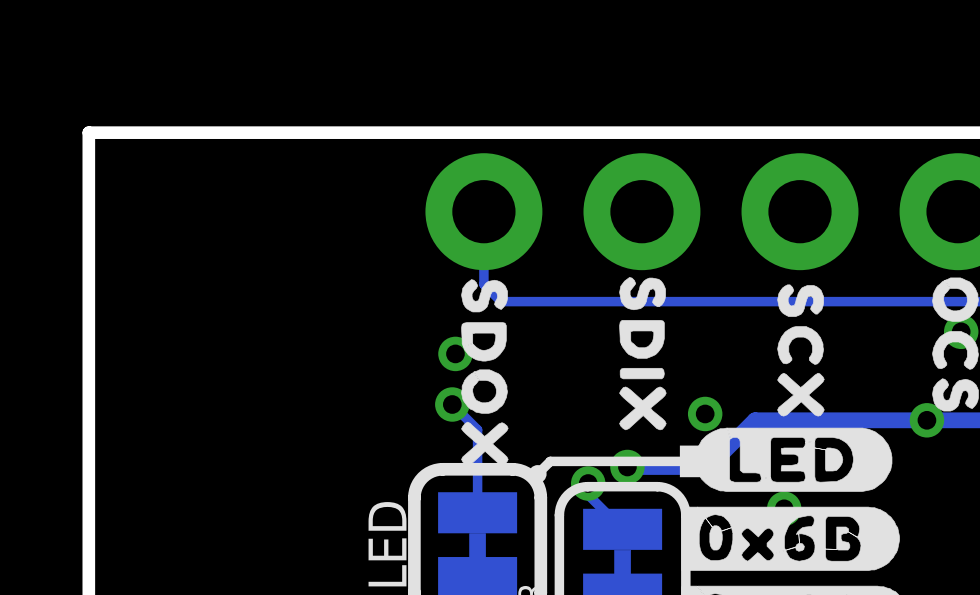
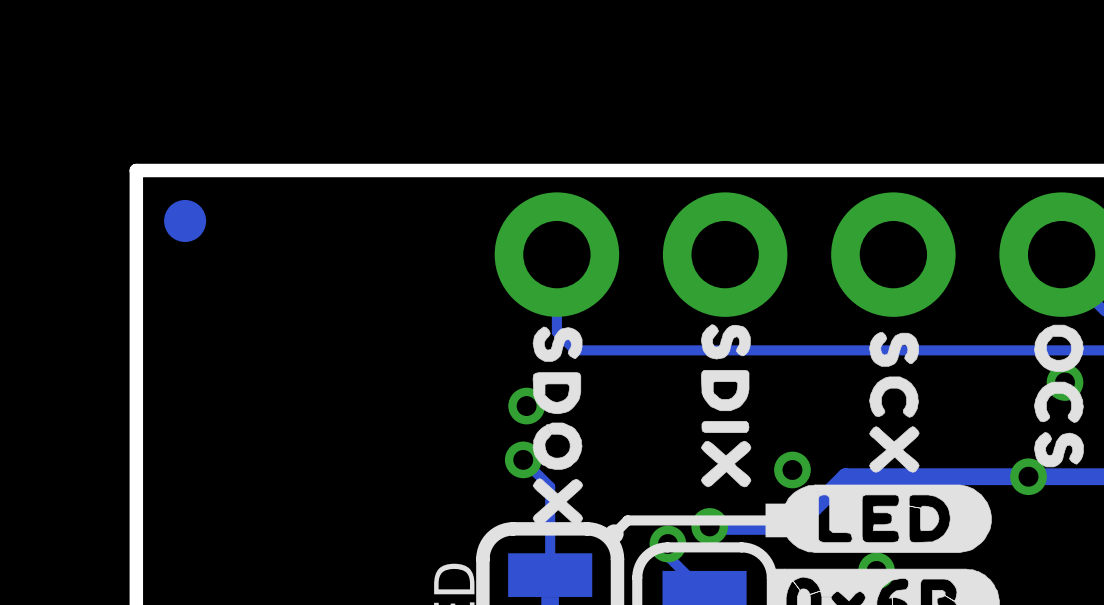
part: none -> (185, 220)

